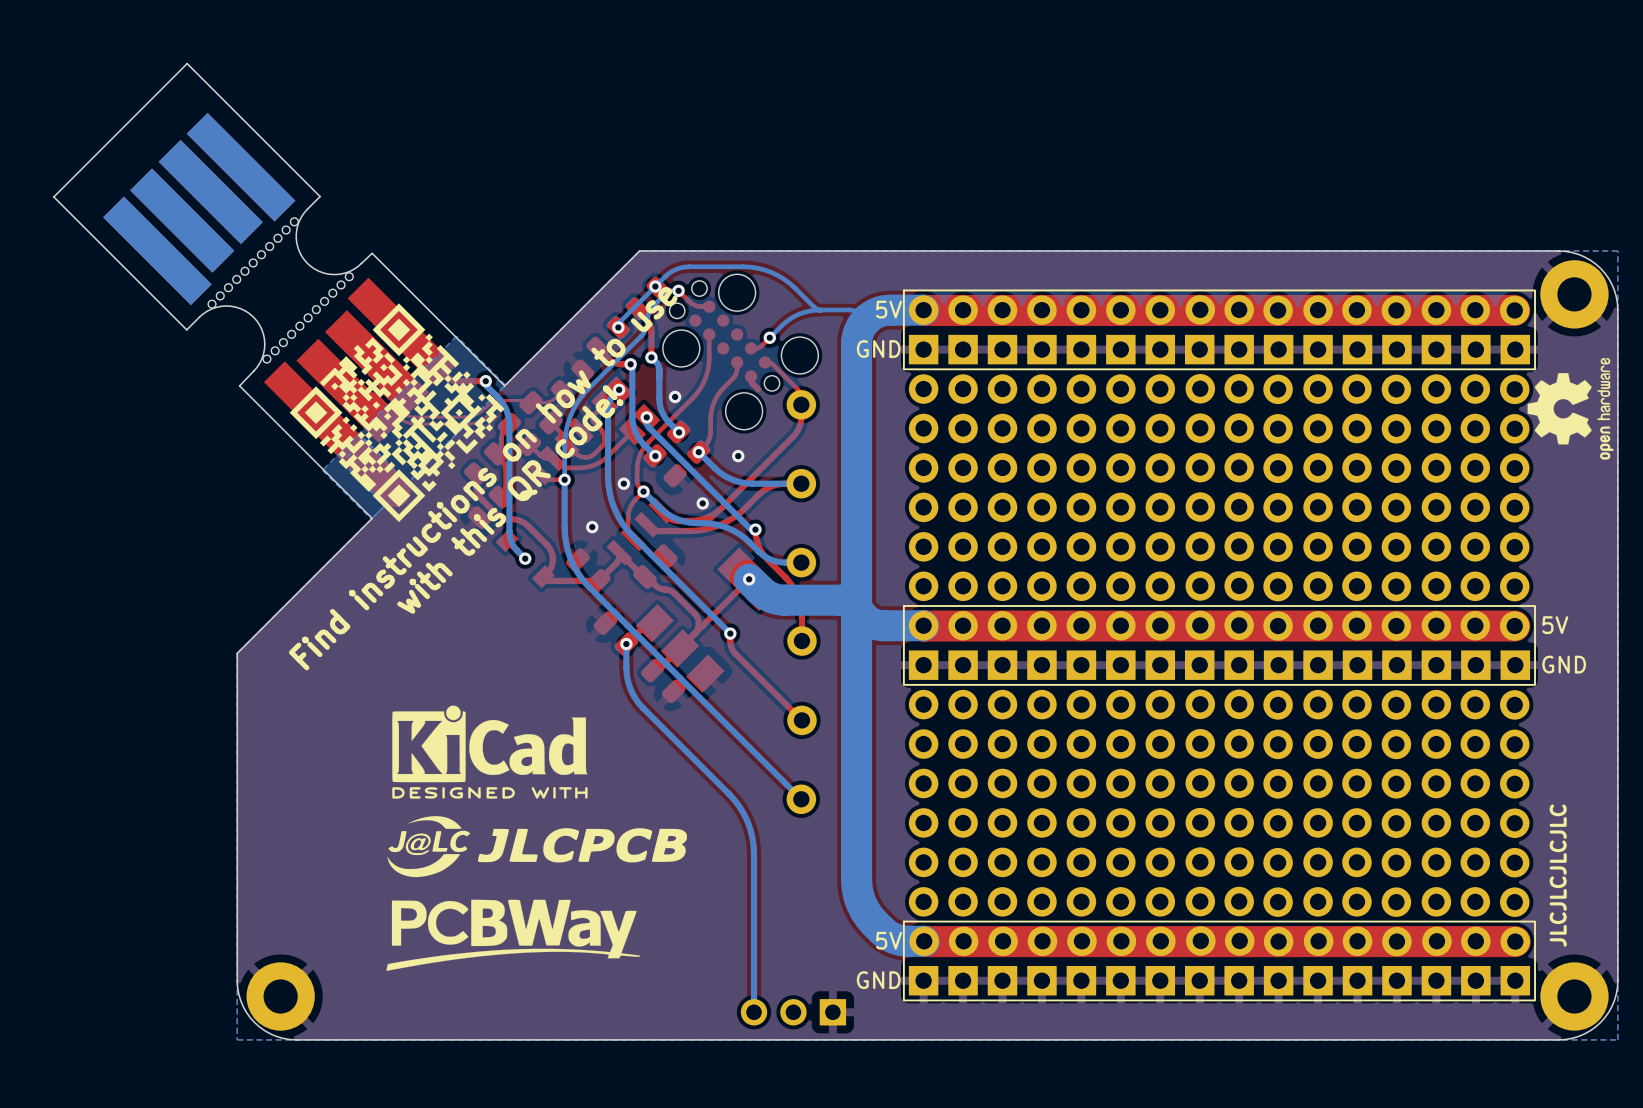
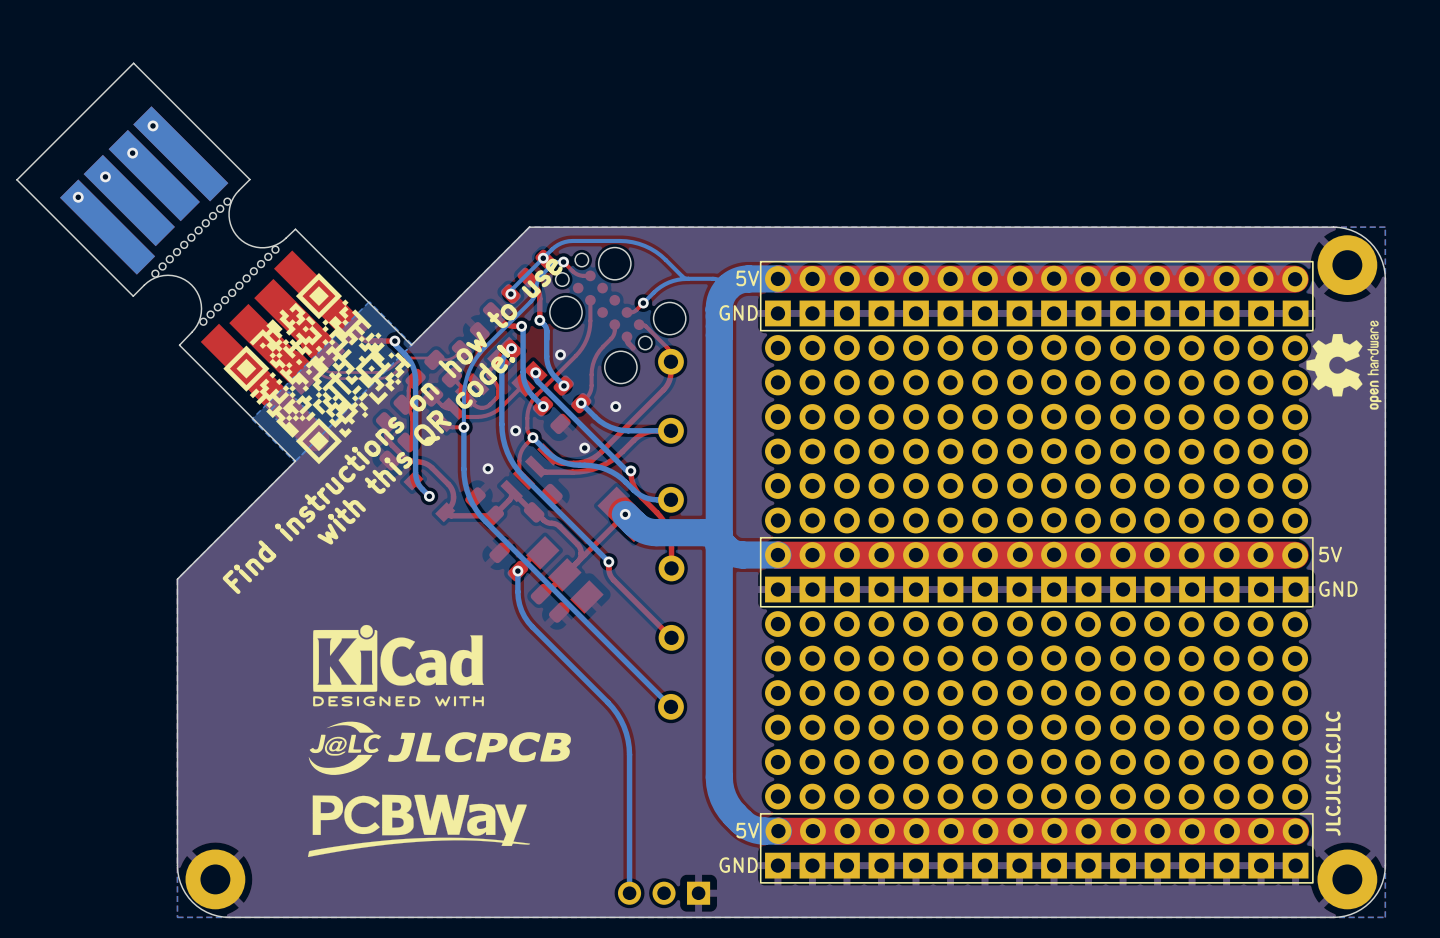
via: none -> (153, 125)
via: none -> (132, 153)
via: none -> (105, 176)
via: none -> (78, 197)

